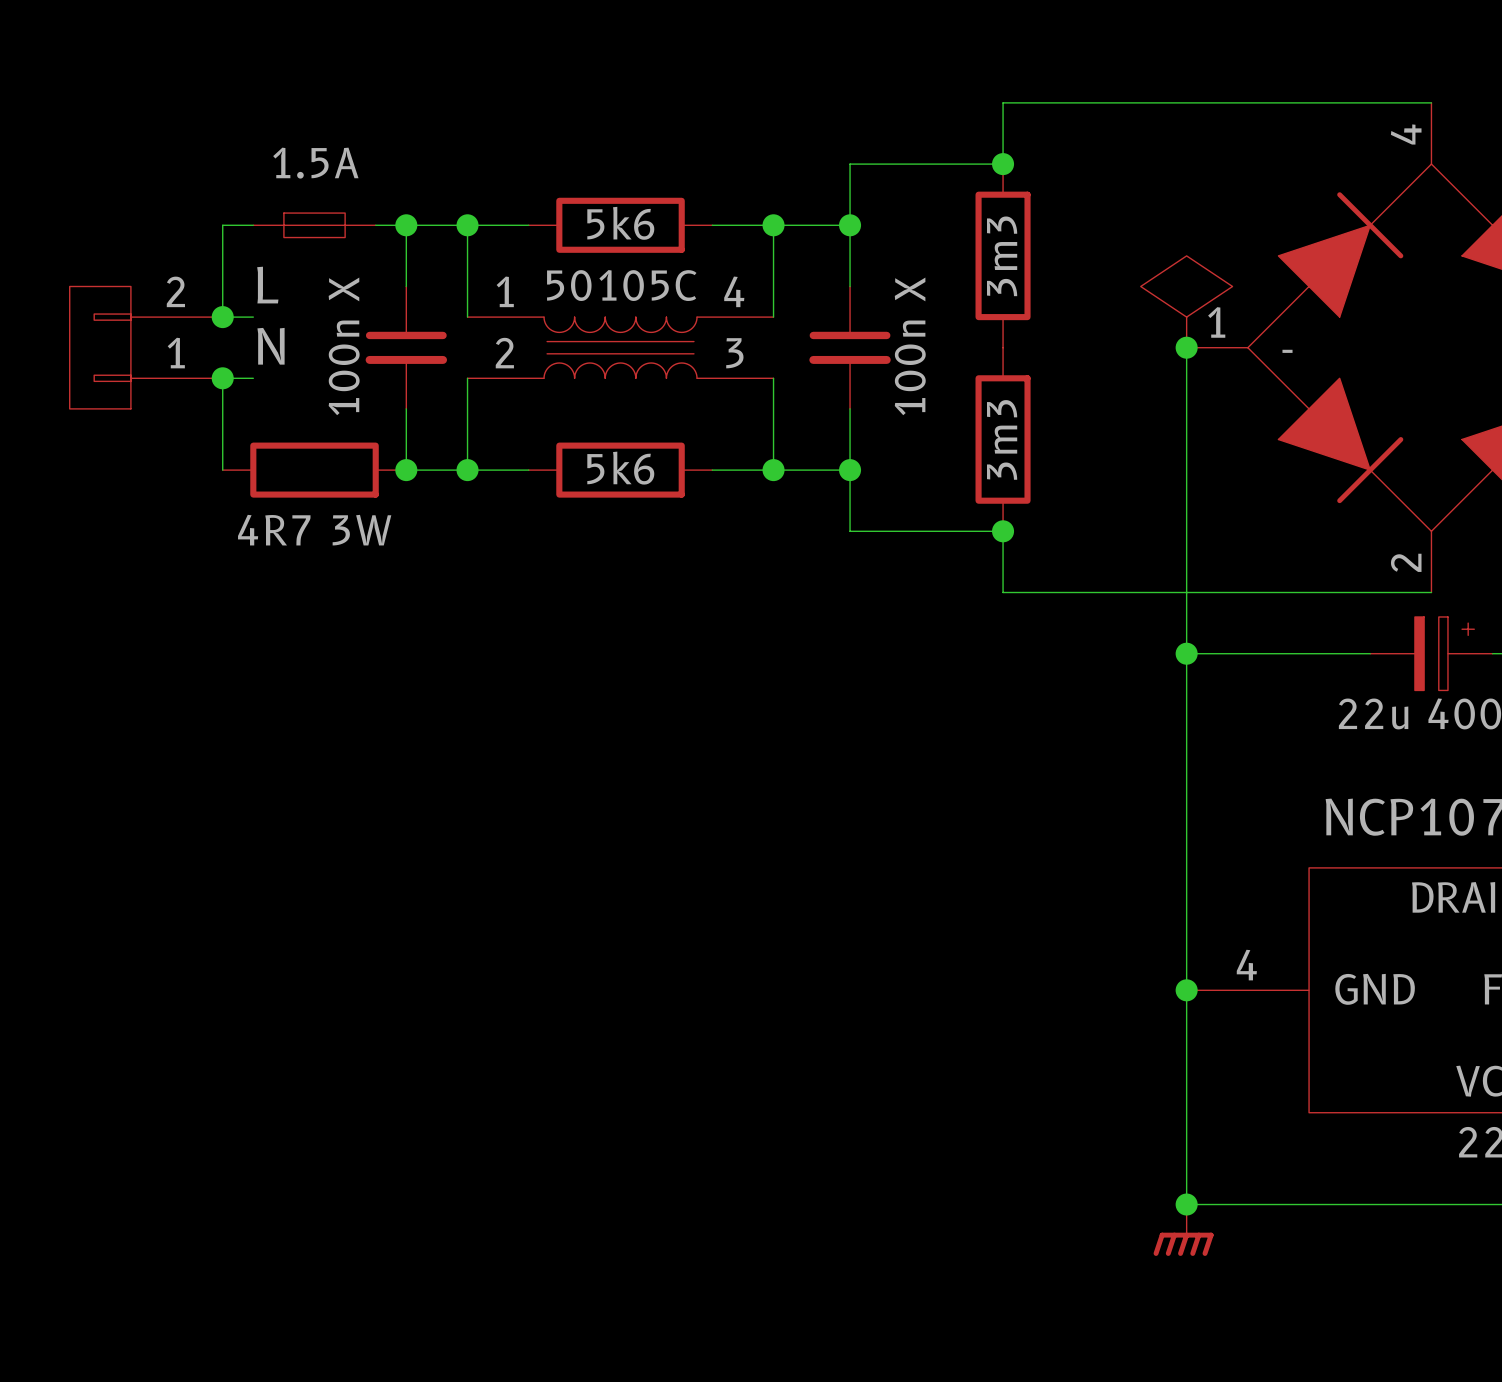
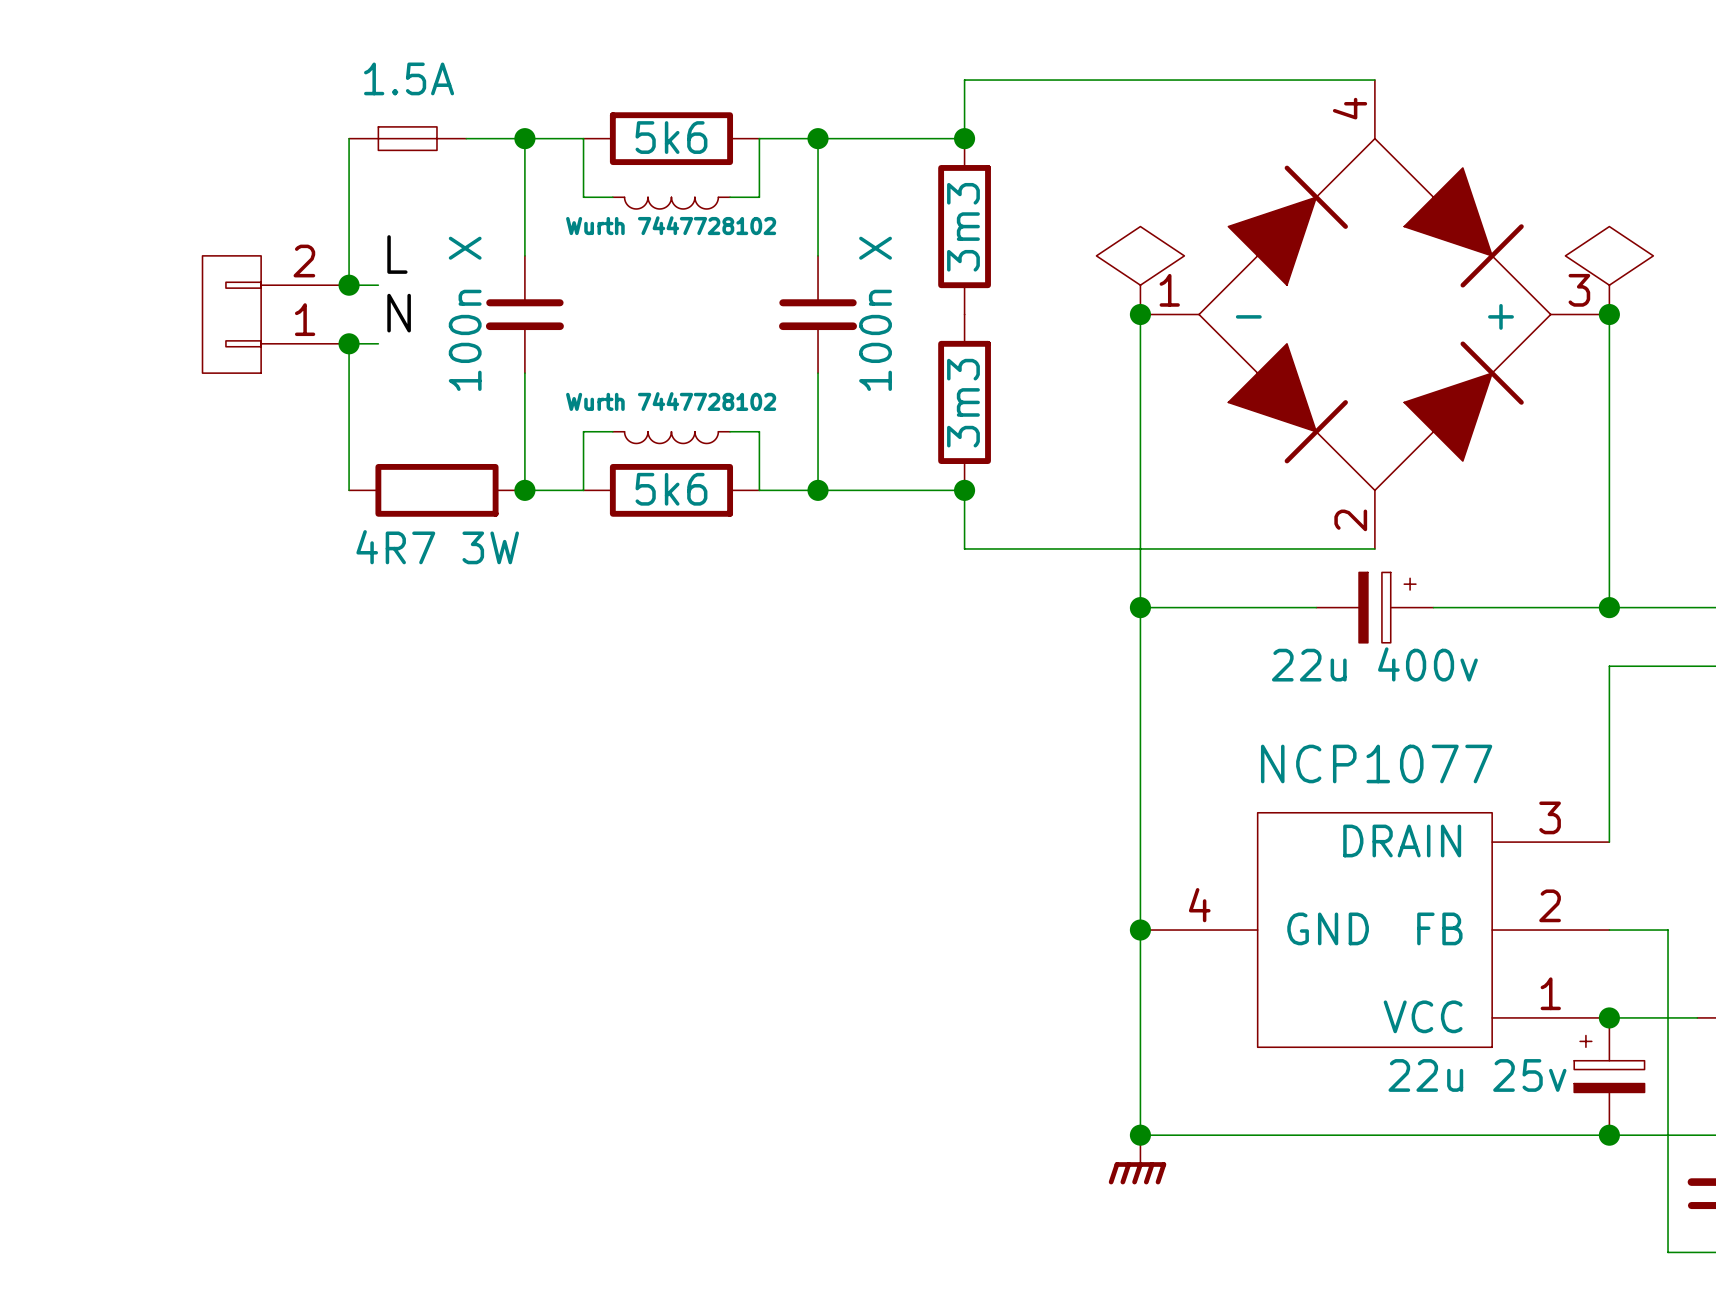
wire: none -> (349, 138) (349, 285) (378, 285)
wire: none -> (466, 138) (583, 138) (583, 197) (612, 197)
wire: none -> (524, 138) (524, 255)
junction: none -> (524, 138)
junction: none -> (818, 138)
wire: (253, 225) (222, 225) (222, 317) (253, 317) -> none
part position: (314, 225) -> (407, 138)
wire: (375, 225) (528, 225) -> none
wire: (406, 225) (406, 286) -> none
junction: (406, 225) -> none
wire: (467, 225) (467, 317) -> none
junction: (467, 225) -> none
part position: (620, 225) -> (671, 138)
wire: (712, 225) (758, 225) -> none
wire: (773, 225) (773, 317) -> none
junction: (773, 225) -> none
wire: (788, 225) (850, 225) -> (759, 197) (759, 138) (818, 138)
junction: (850, 225) -> none
part: none -> Wurth 7447728102 (671, 203)
label position: L (267, 285) -> L (397, 254)
junction: (222, 317) -> none
junction: none -> (349, 285)
label position: N (271, 346) -> N (399, 313)
part position: (146, 347) -> (275, 314)
part position: (406, 347) -> (524, 314)
part: 50105C (620, 347) -> none
junction: (222, 378) -> none
wire: (253, 378) (222, 378) (222, 470) -> none
junction: none -> (349, 343)
wire: none -> (378, 343) (349, 343) (349, 490)
wire: (467, 378) (467, 470) -> none
wire: (773, 378) (773, 470) -> none
wire: (406, 408) (406, 470) (528, 470) -> none
wire: none -> (524, 373) (524, 490) (583, 490) (583, 431) (612, 431)
part position: (314, 470) -> (436, 490)
junction: (406, 470) -> none
junction: (467, 470) -> none
part position: (620, 470) -> (671, 490)
wire: (712, 470) (758, 470) -> none
junction: (773, 470) -> none
wire: (788, 470) (850, 470) -> (759, 431) (759, 490) (818, 490)
junction: (850, 470) -> none
part: none -> Wurth 7447728102 (671, 437)
junction: none -> (524, 490)
junction: none -> (818, 490)

